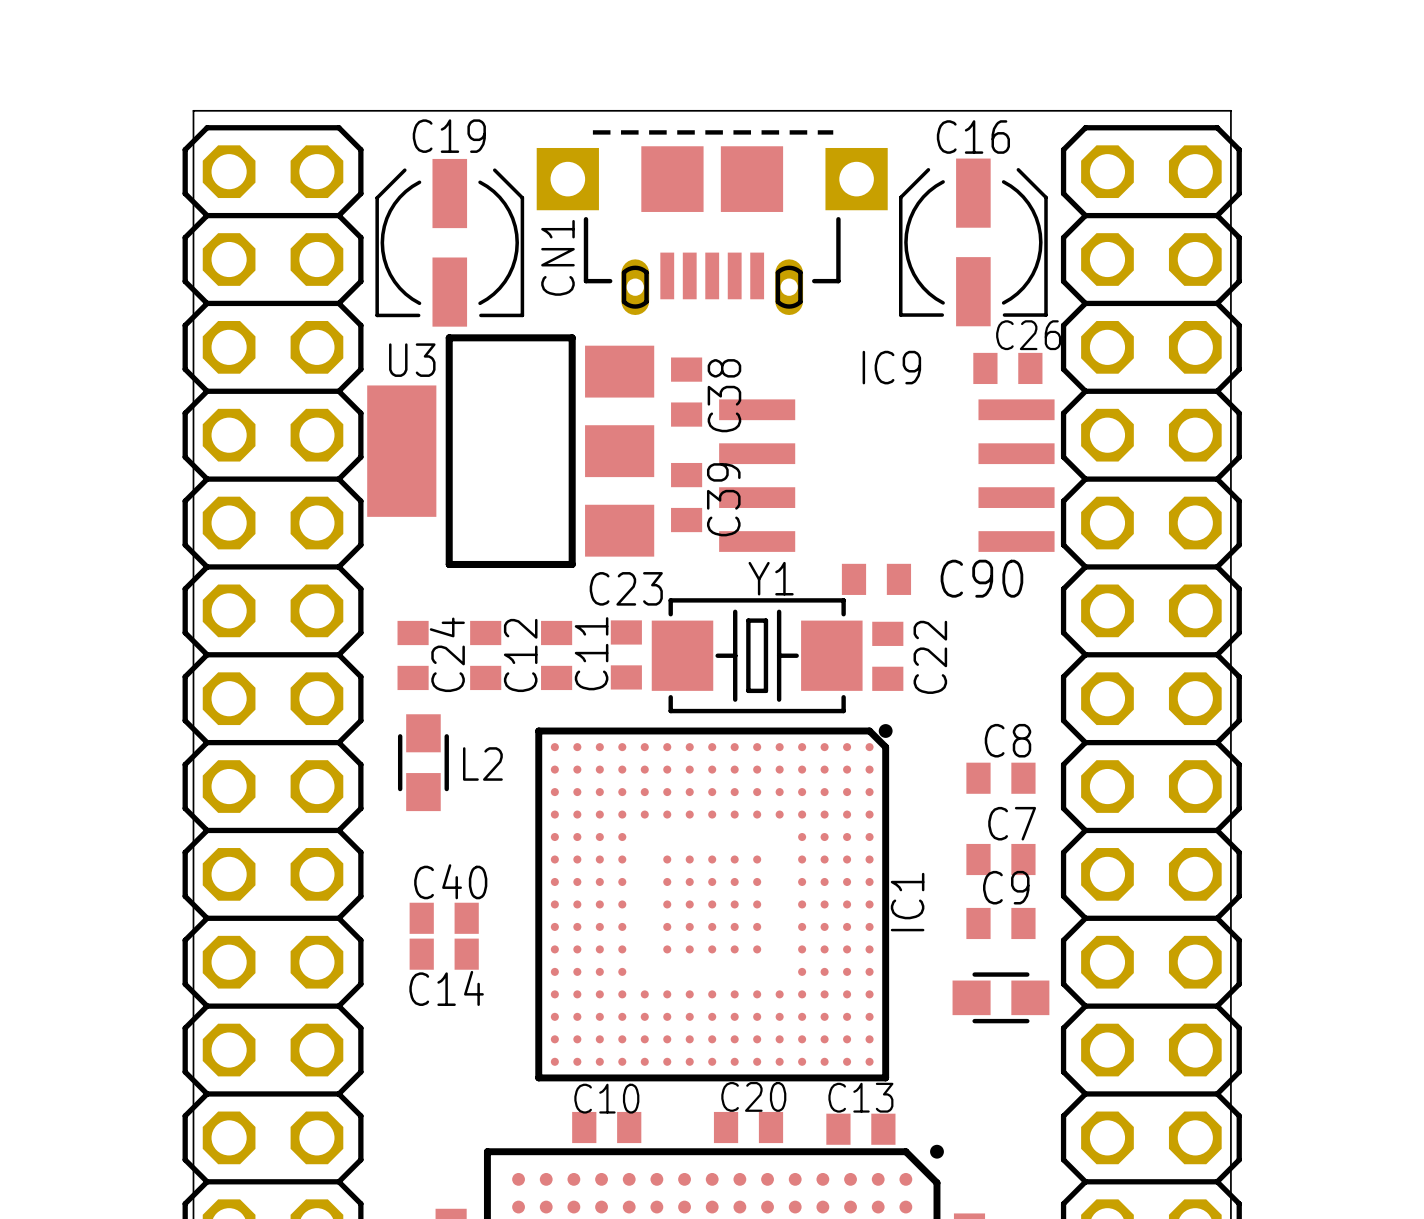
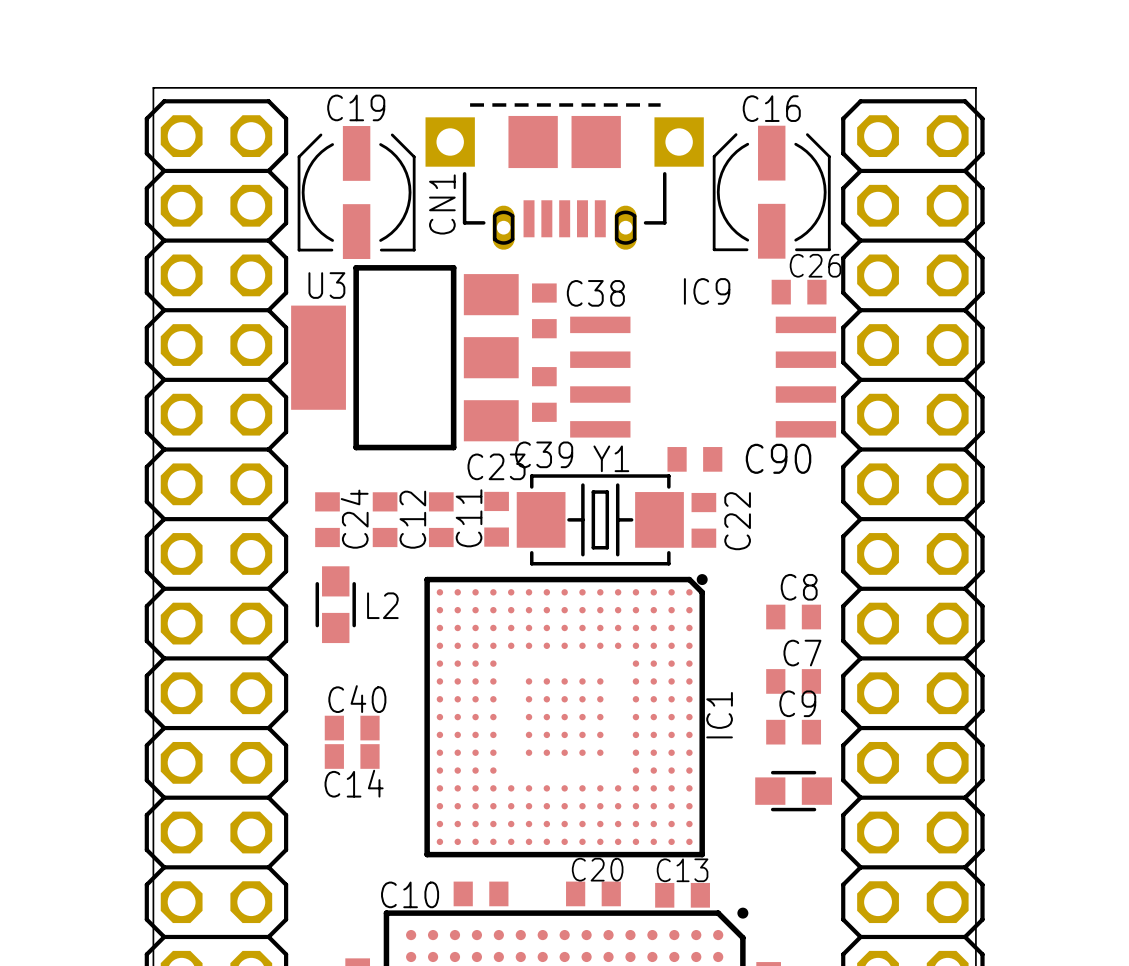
C38 name rotation: 0° (724, 395) -> 90° clockwise (595, 293)
C39 name rotation: 0° (723, 499) -> 90° clockwise (544, 454)
C10 name position: C10 (606, 1098) -> C10 (410, 894)

